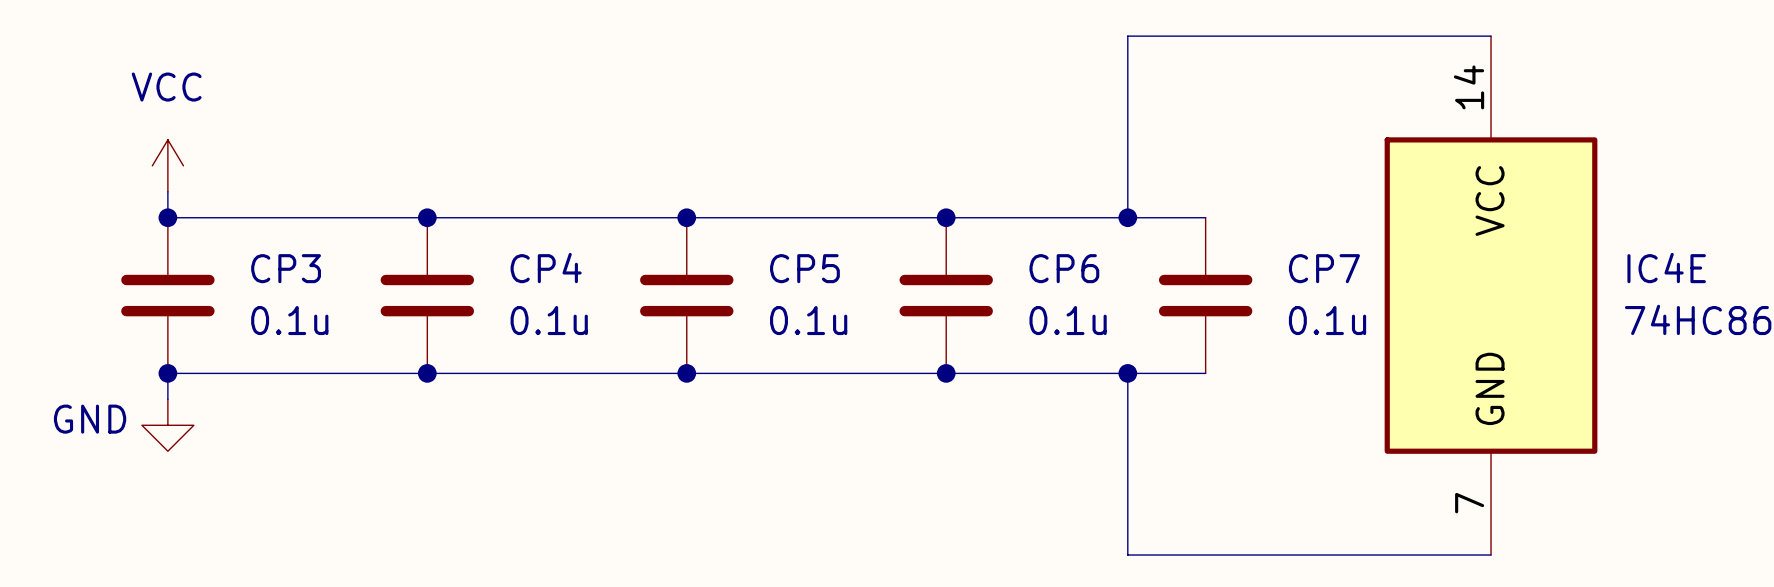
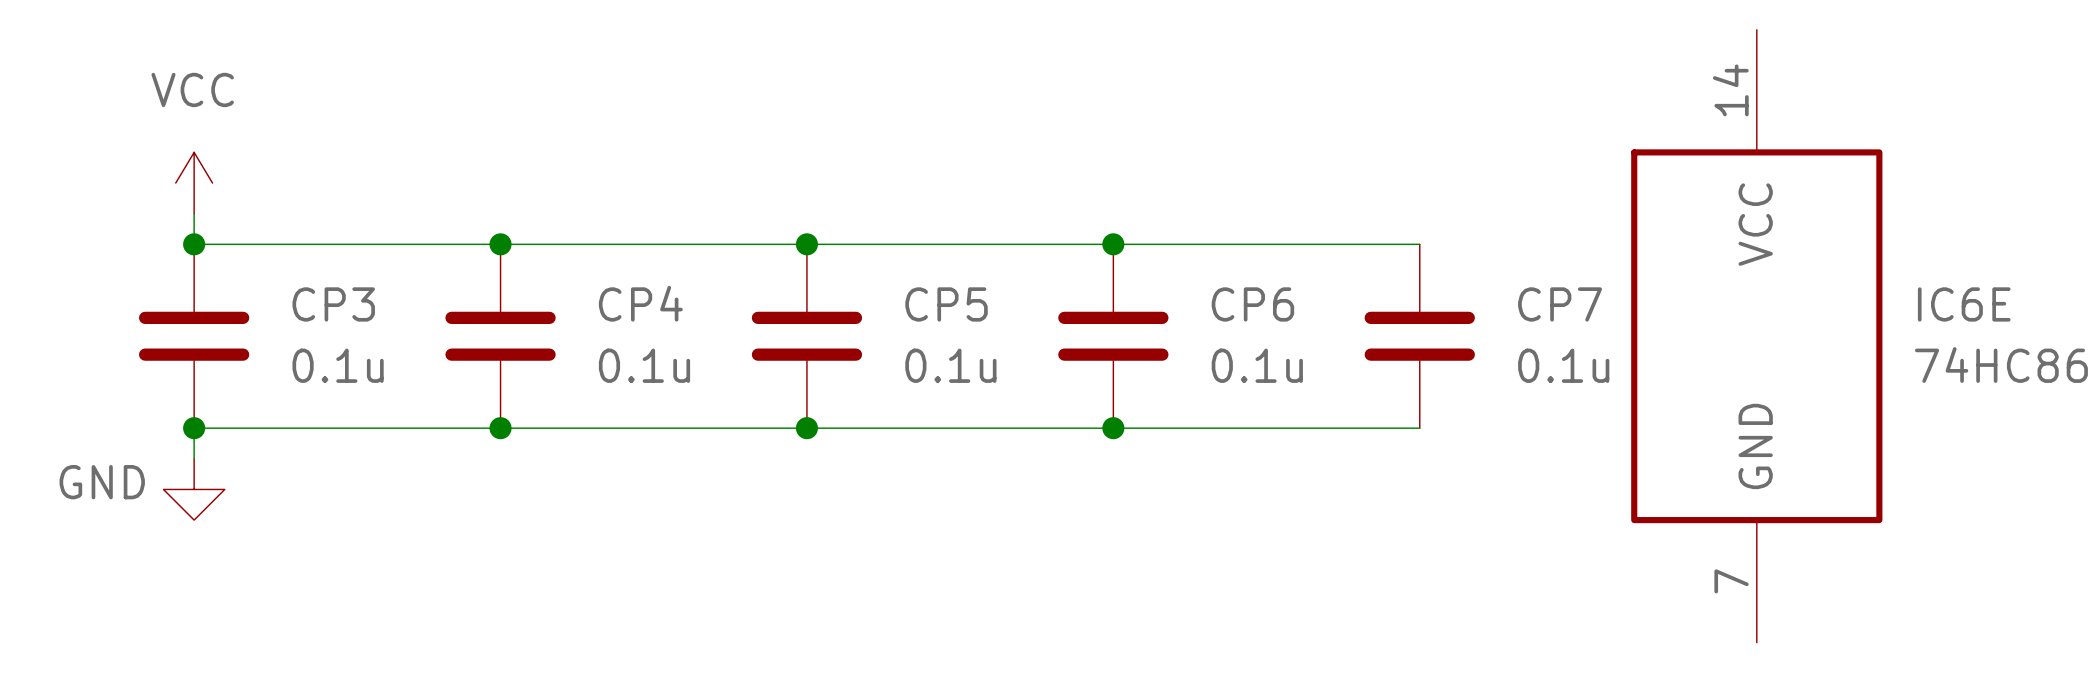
wire: (1491, 36) (1127, 36) (1127, 217) -> none
junction: (1127, 217) -> none
IC4E name: IC4E (1666, 268) -> IC6E (1964, 304)
wire: (1127, 373) (1127, 555) (1491, 555) -> none
junction: (1127, 373) -> none

